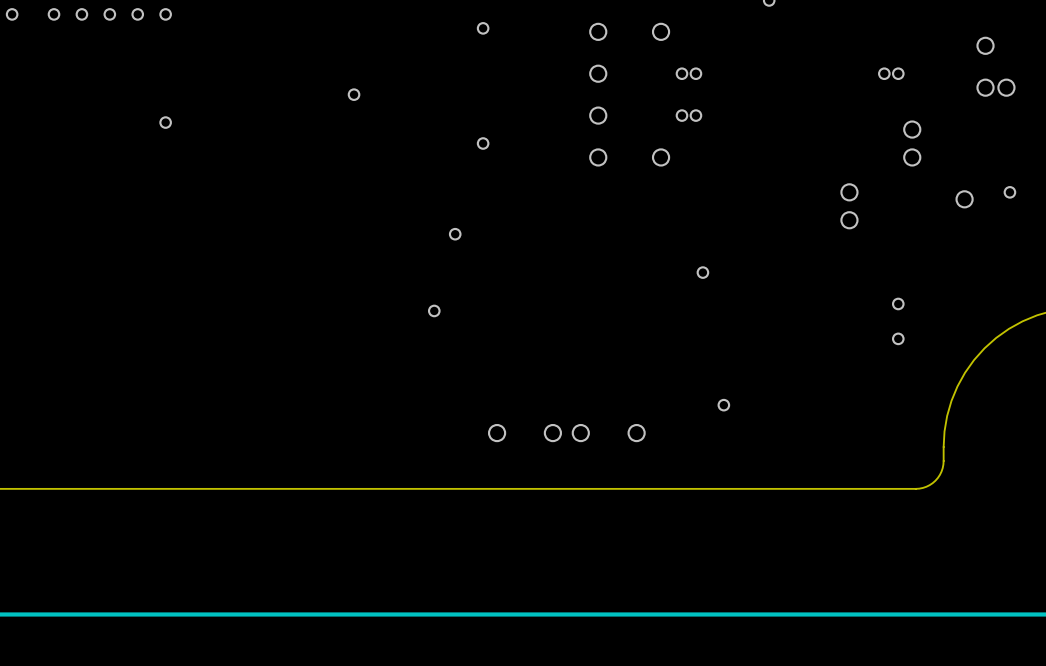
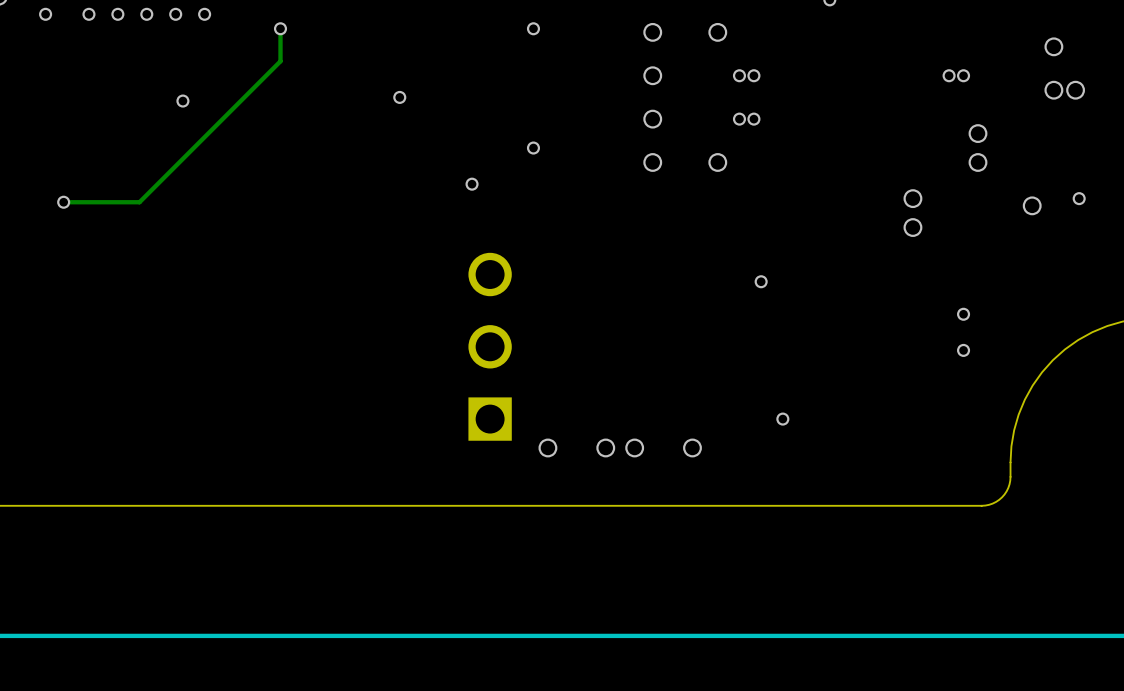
track: none -> (280, 28) (280, 61) (139, 202) (63, 202)
via: none -> (280, 28)
via position: (165, 122) -> (182, 101)
via: none -> (63, 202)
via position: (455, 234) -> (472, 184)
via: (434, 310) -> none
part: none -> (490, 346)

